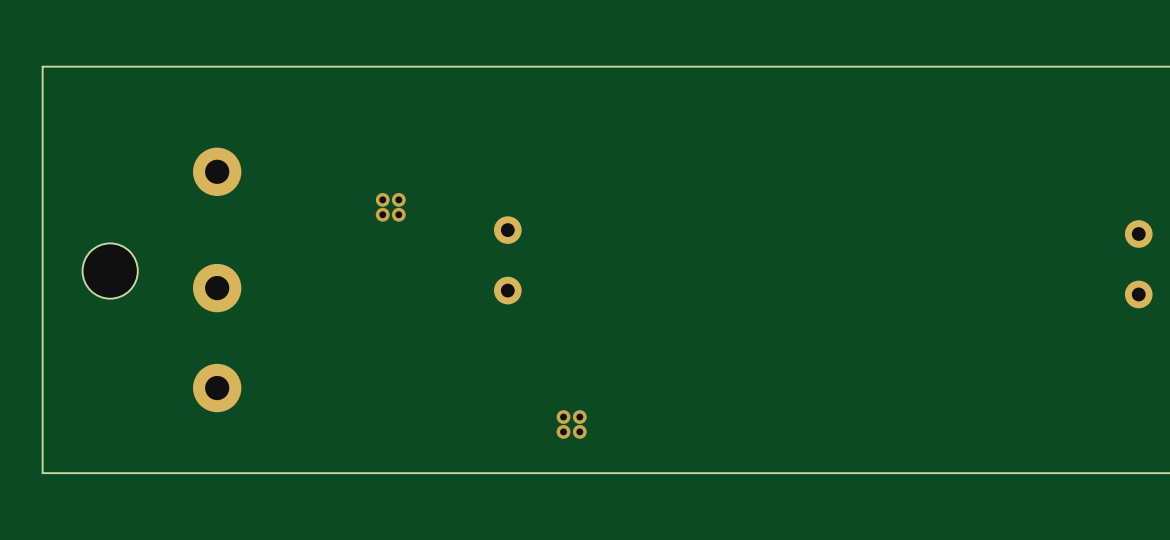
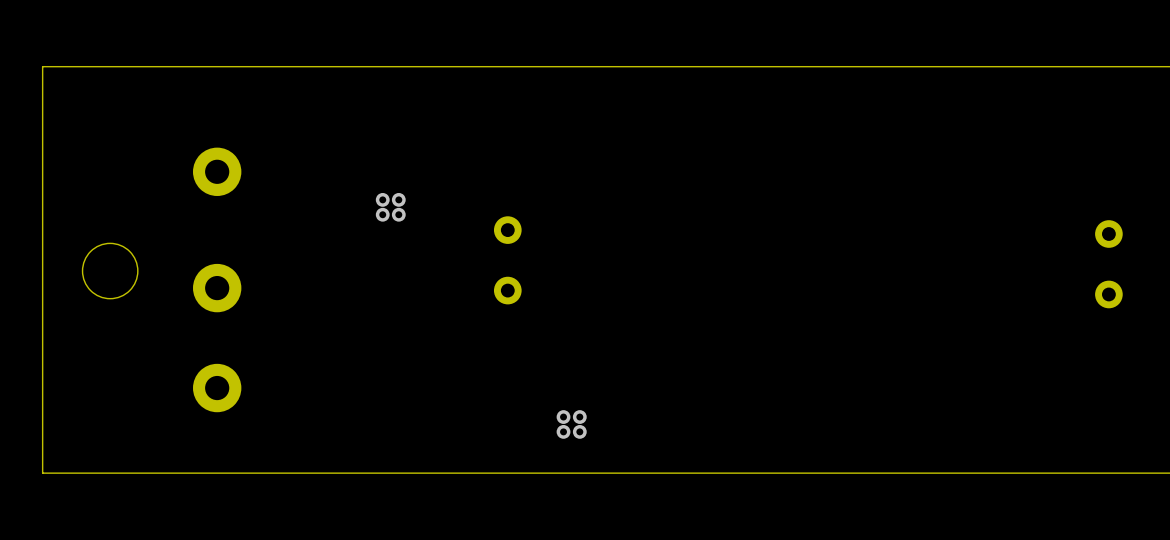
part position: (1138, 264) -> (1108, 264)

